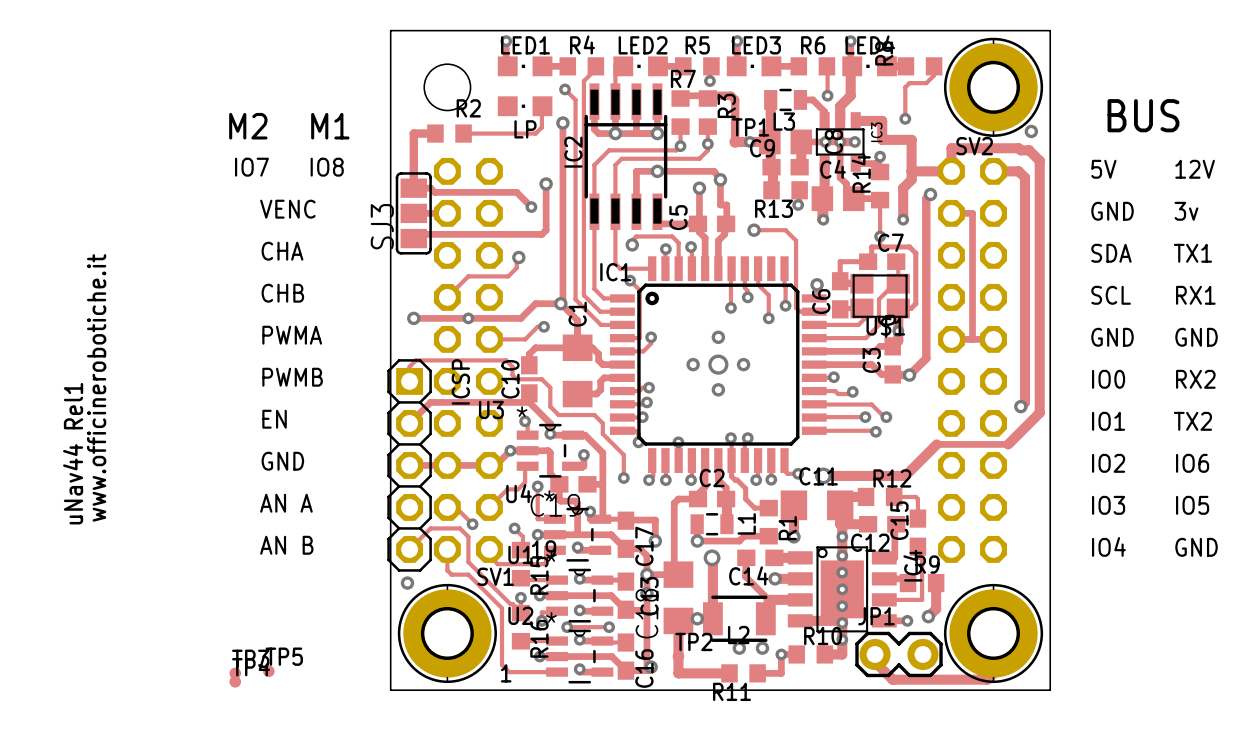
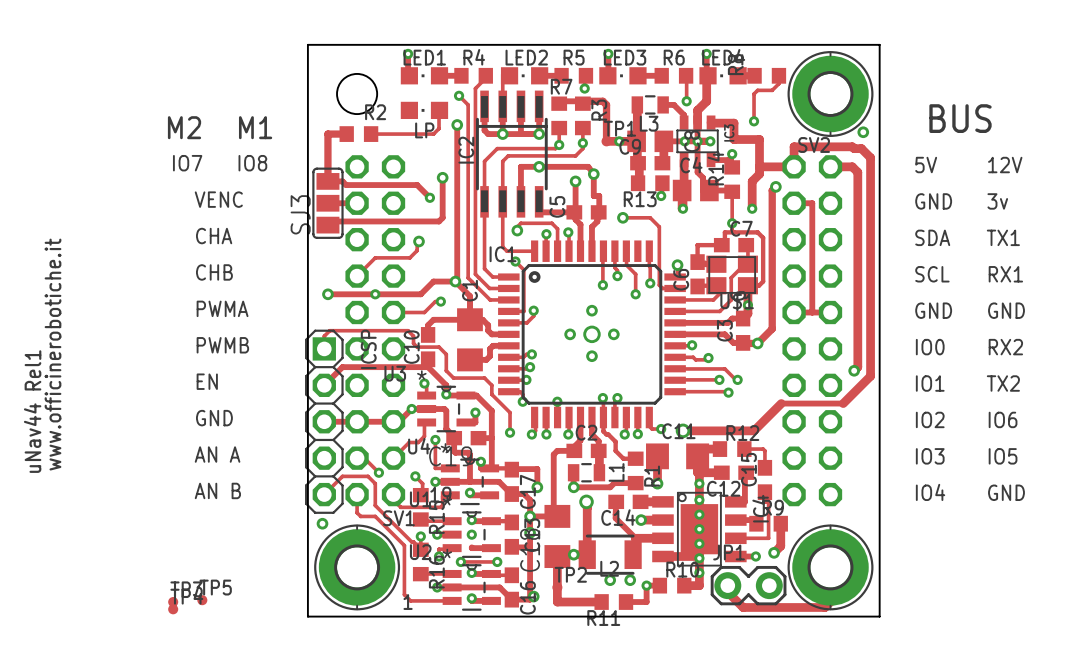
track: (557, 595) (611, 595) (625, 609) -> none
via position: (579, 610) -> (471, 534)

